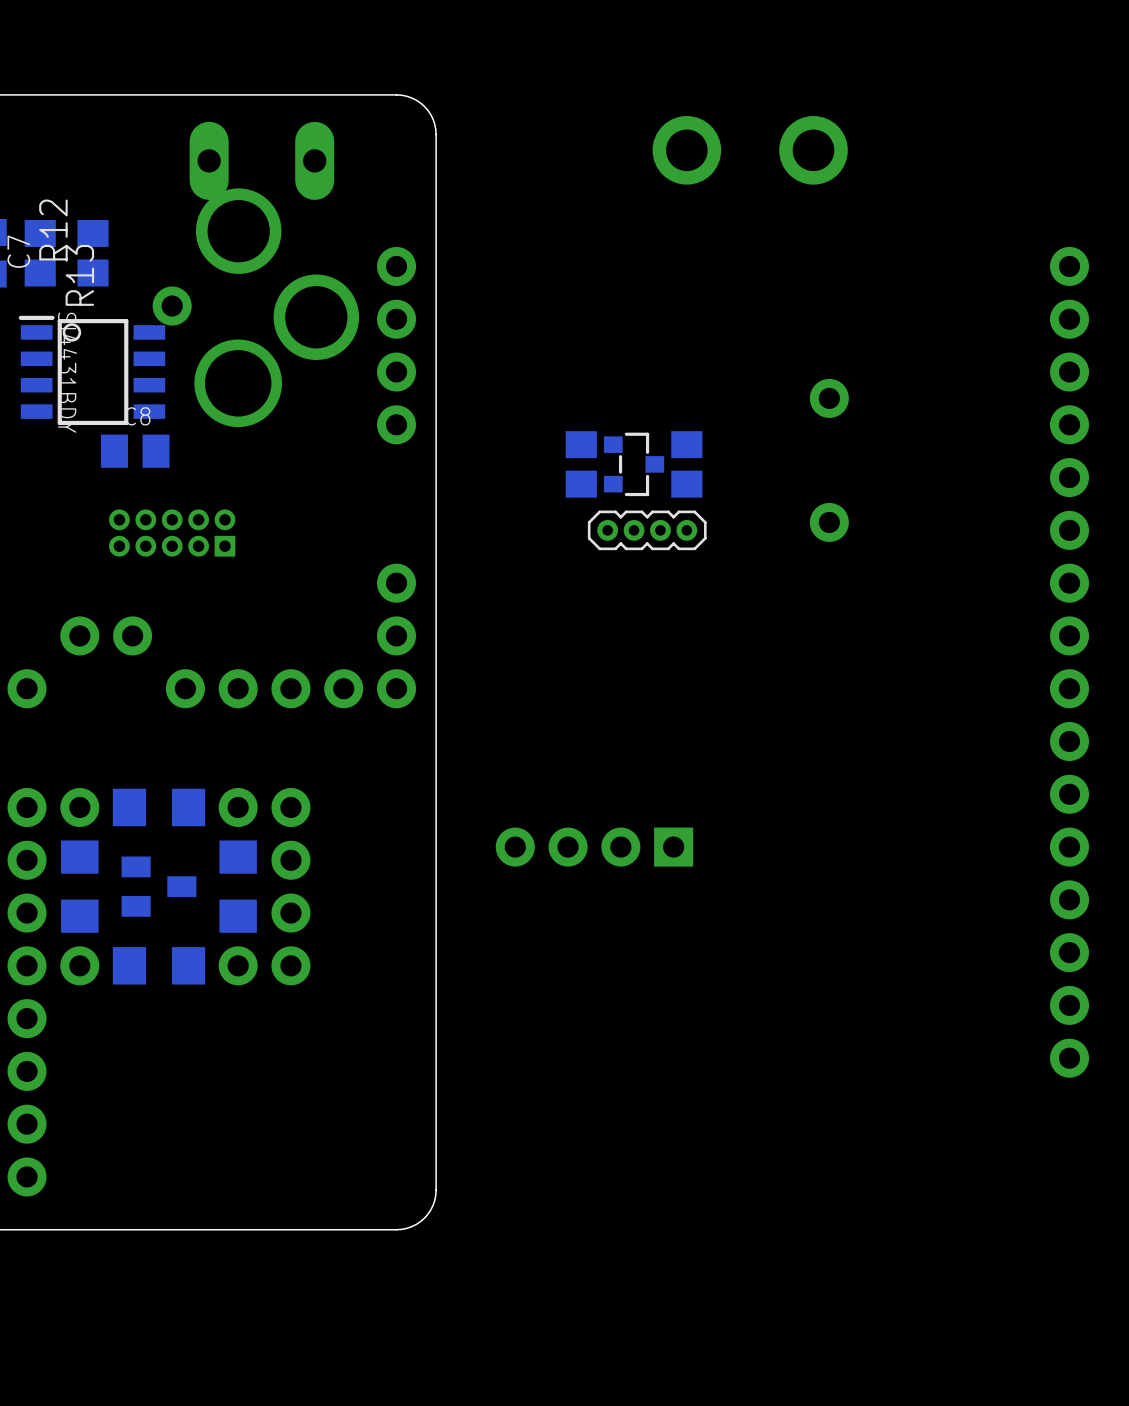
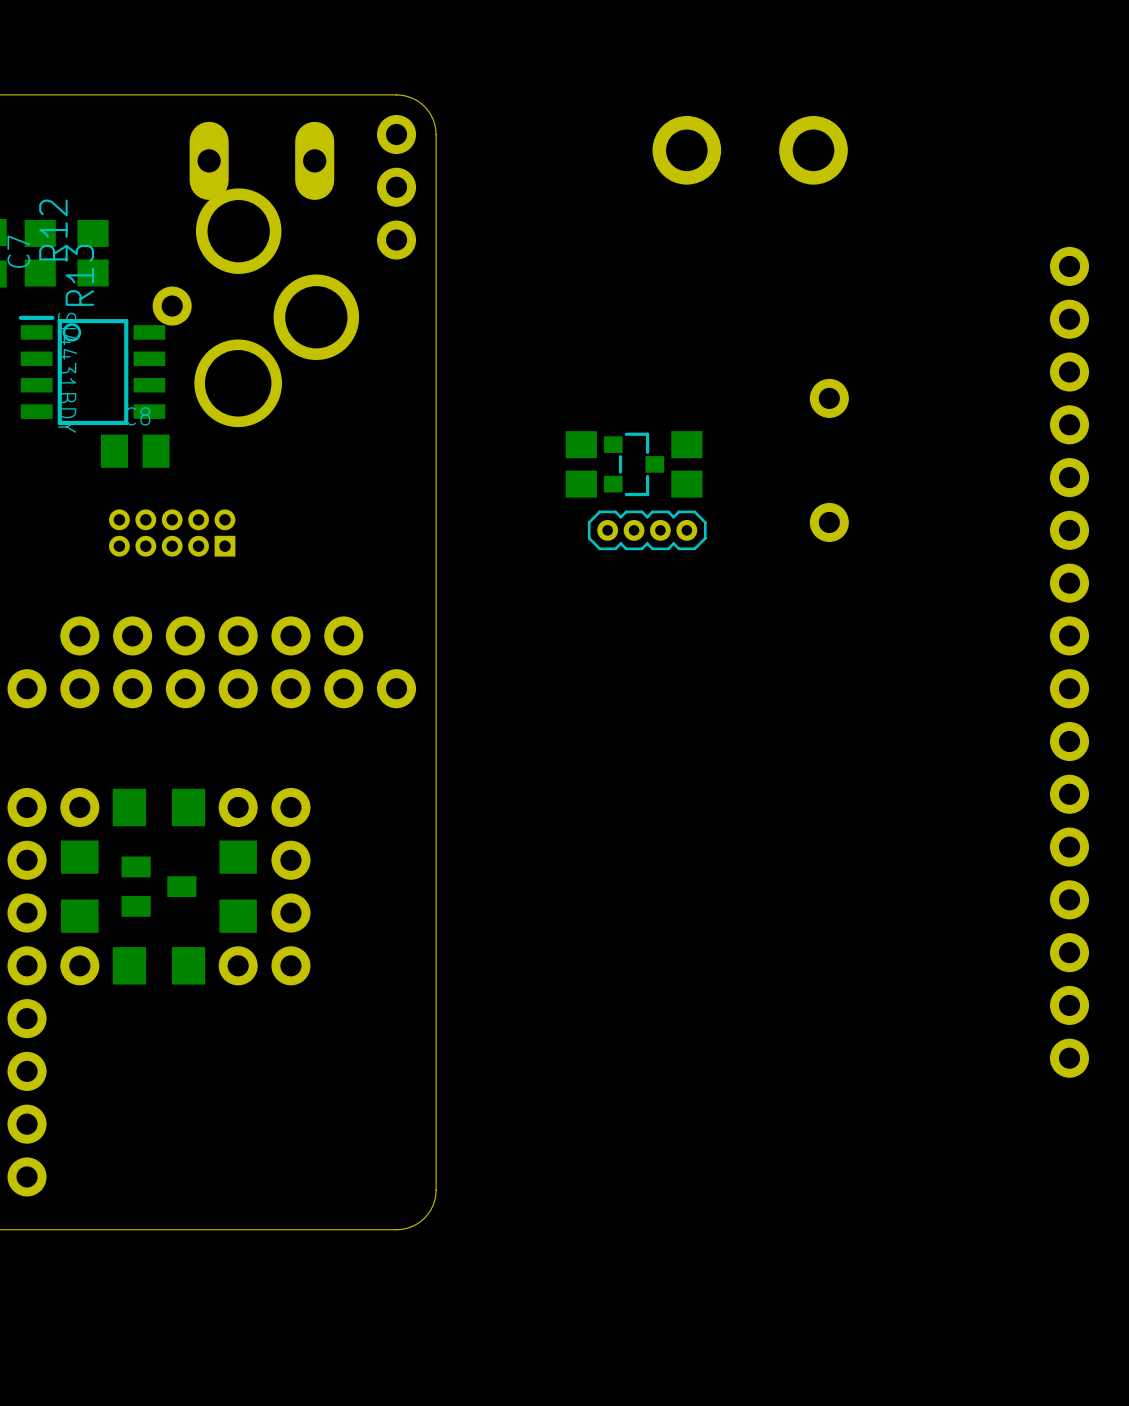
part: none -> (396, 187)
part: (396, 345) -> none
part: (396, 609) -> none
part: none -> (185, 635)
part: none -> (238, 635)
part: none -> (290, 635)
part: none -> (343, 635)
part: none -> (106, 688)
part: (594, 847) -> none

